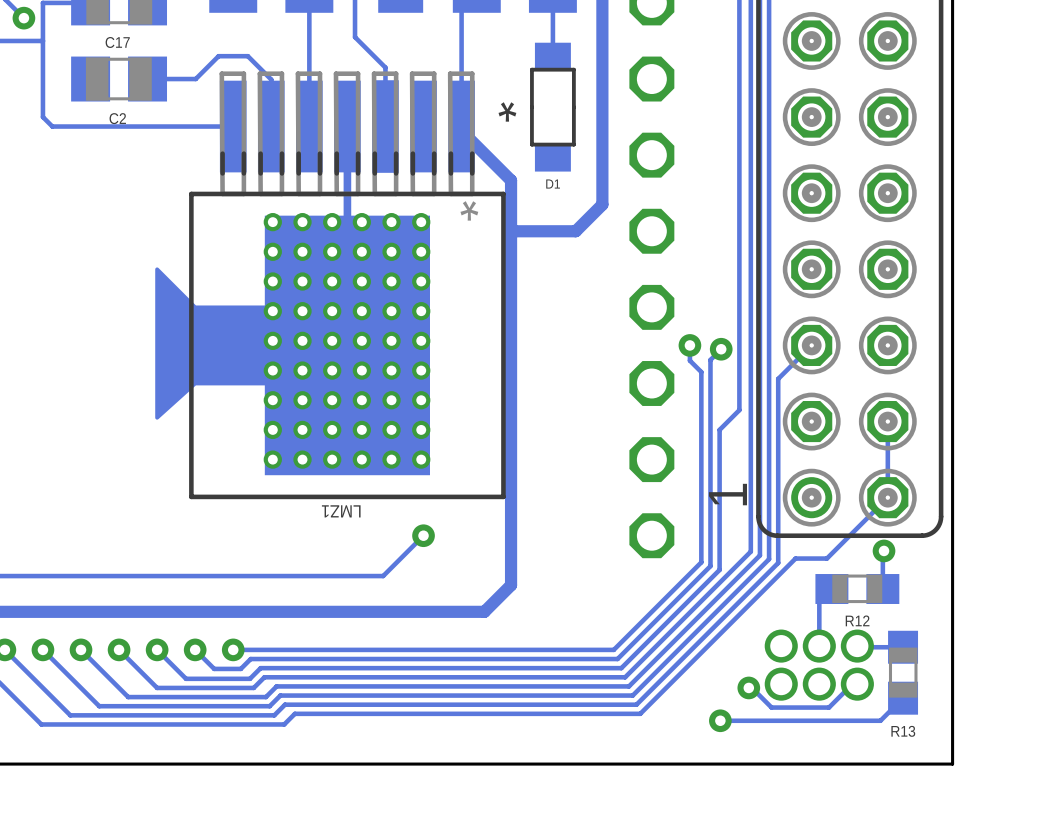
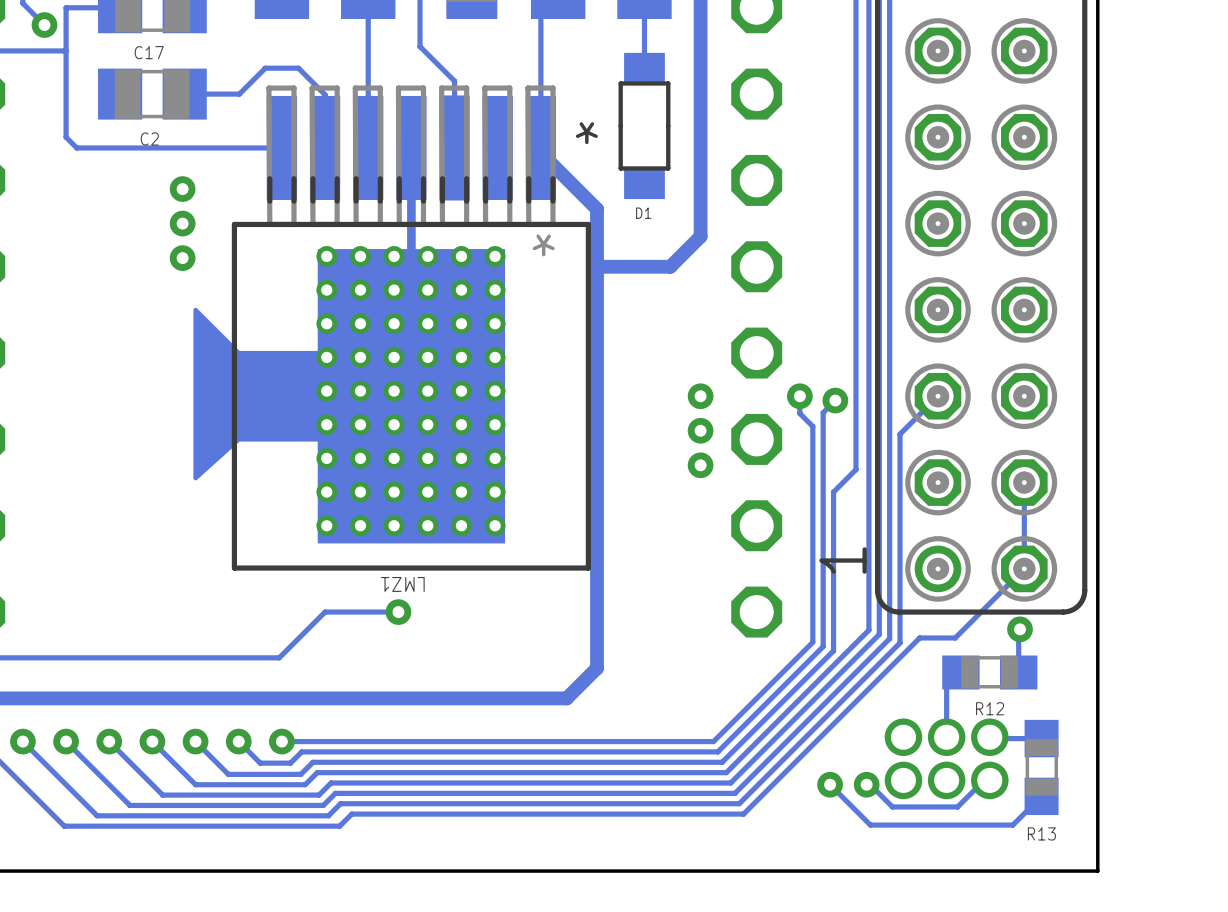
via: none -> (182, 189)
via: none -> (182, 223)
via: none -> (182, 258)
via: none -> (700, 396)
via: none -> (700, 430)
via: none -> (700, 465)
track: (423, 535) (383, 576) (230, 576) -> (398, 612) (325, 612) (279, 657)
via position: (423, 535) -> (398, 612)
via position: (720, 720) -> (830, 784)
track: (880, 720) (720, 720) -> (1016, 821) (1012, 825) (870, 825) (830, 784)

